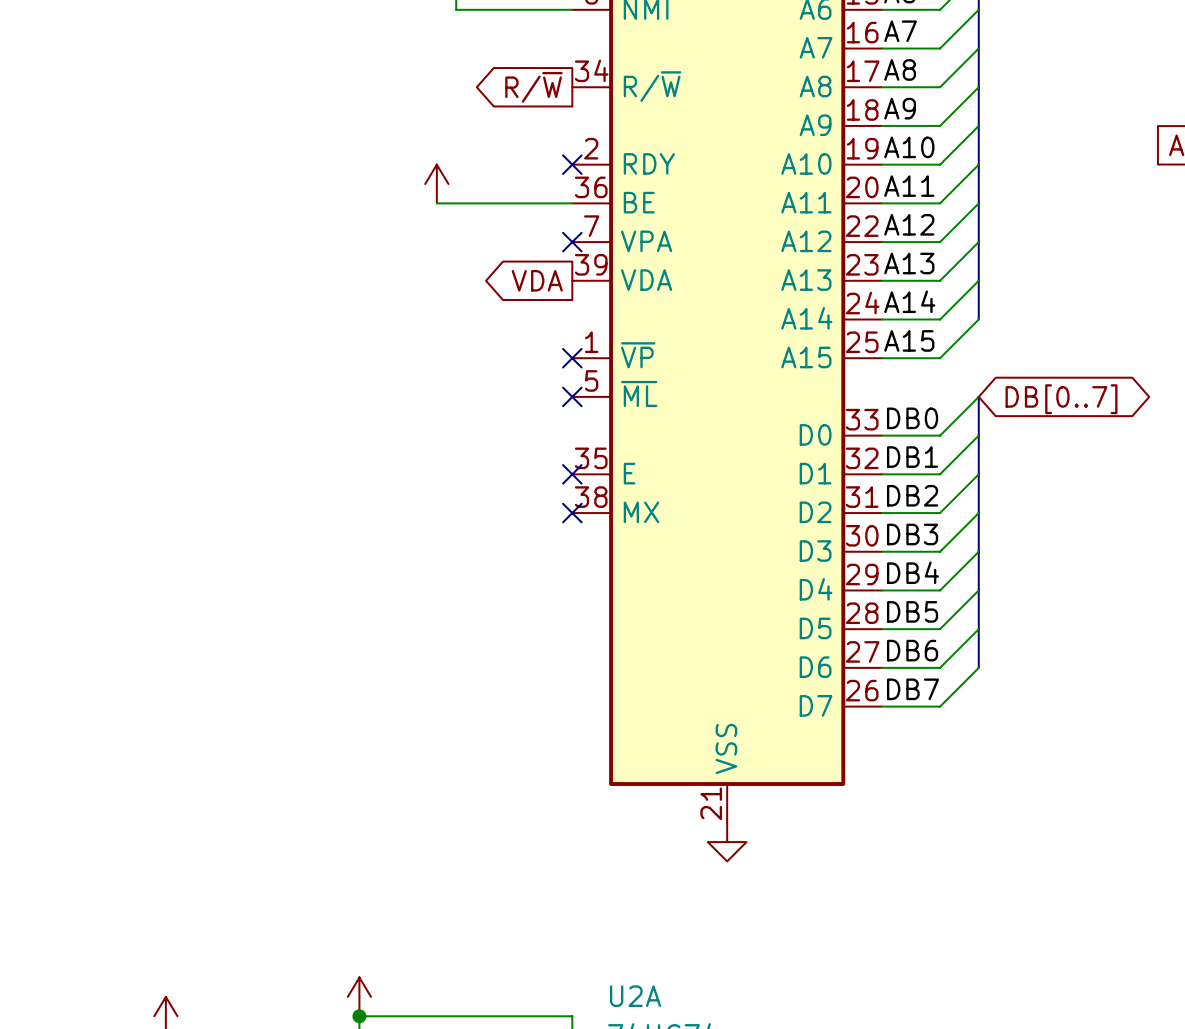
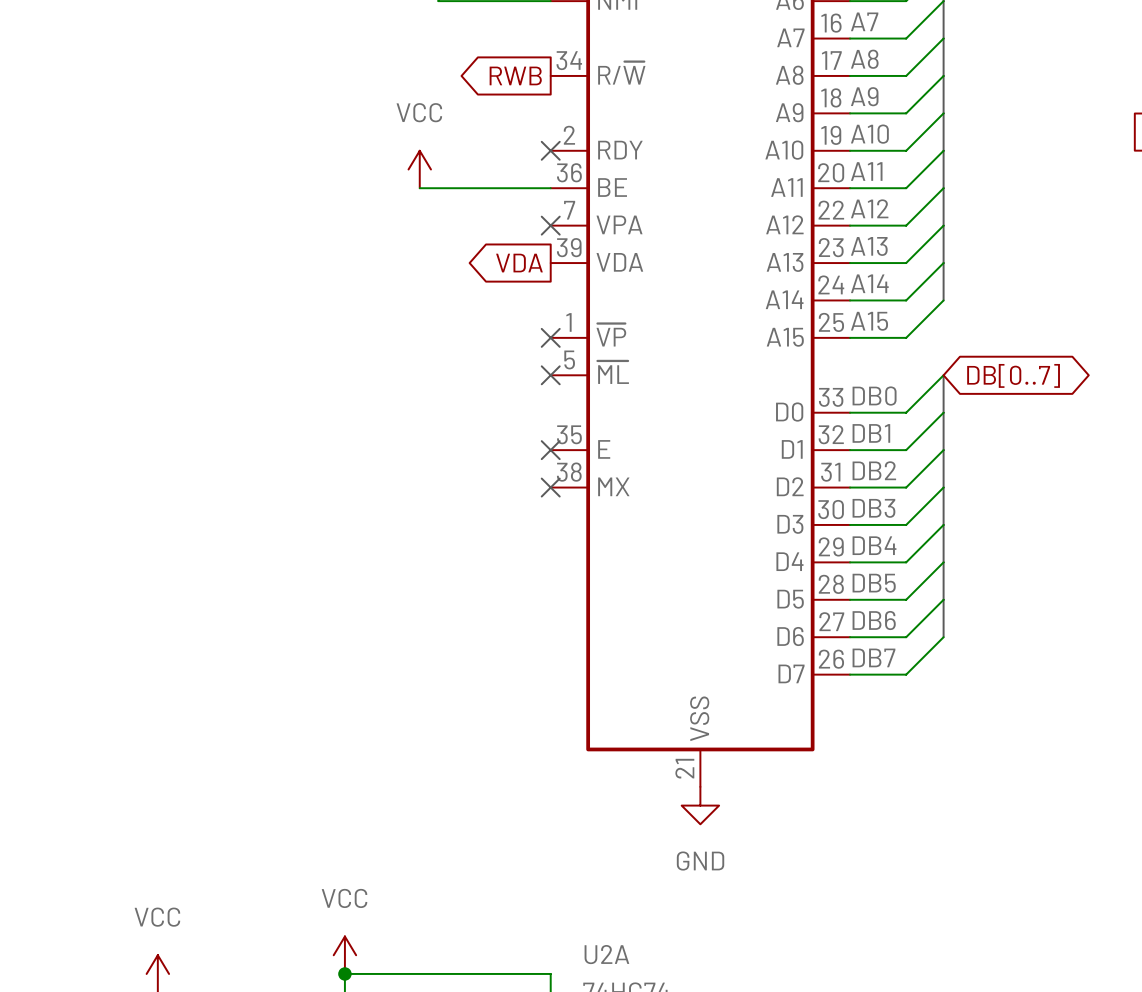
global label: R/~{W} (534, 87) -> RWB (515, 75)
power symbol text: none -> VCC (419, 112)
power symbol text: none -> GND (700, 861)
power symbol text: none -> VCC (344, 898)
power symbol text: none -> VCC (157, 917)

